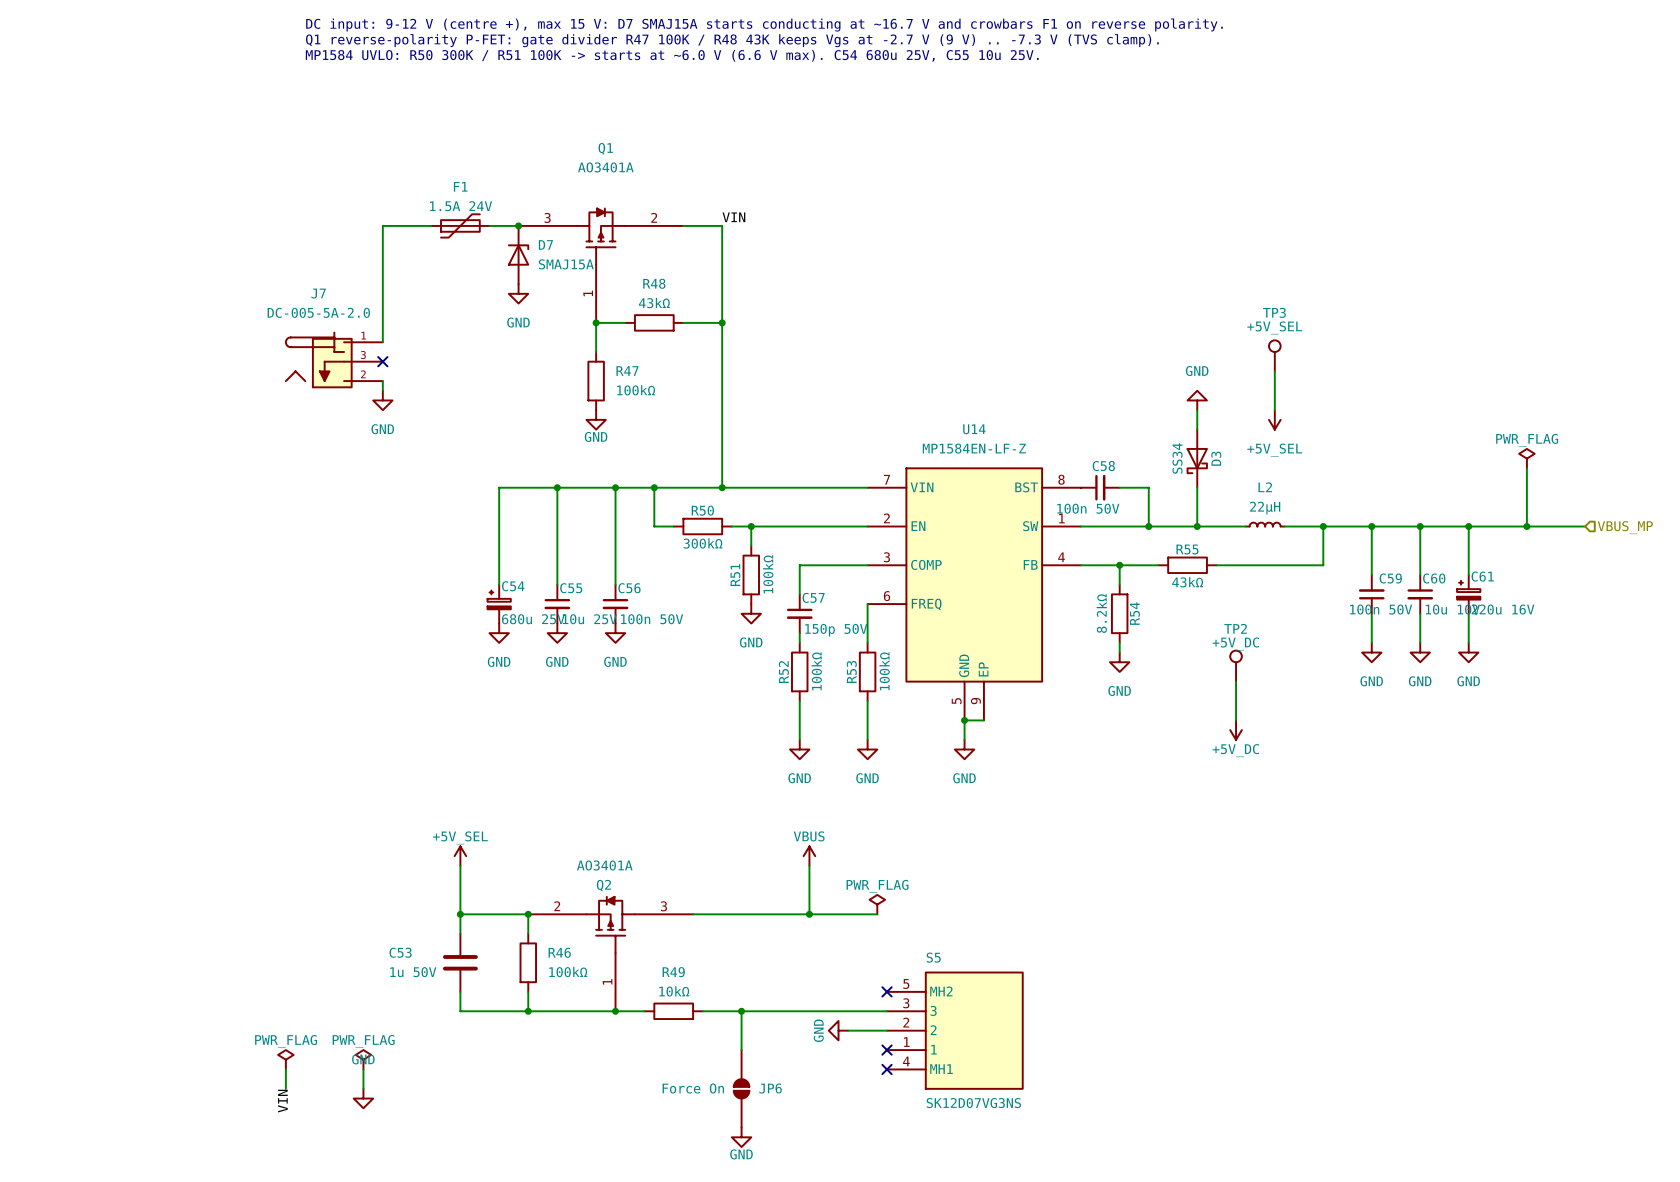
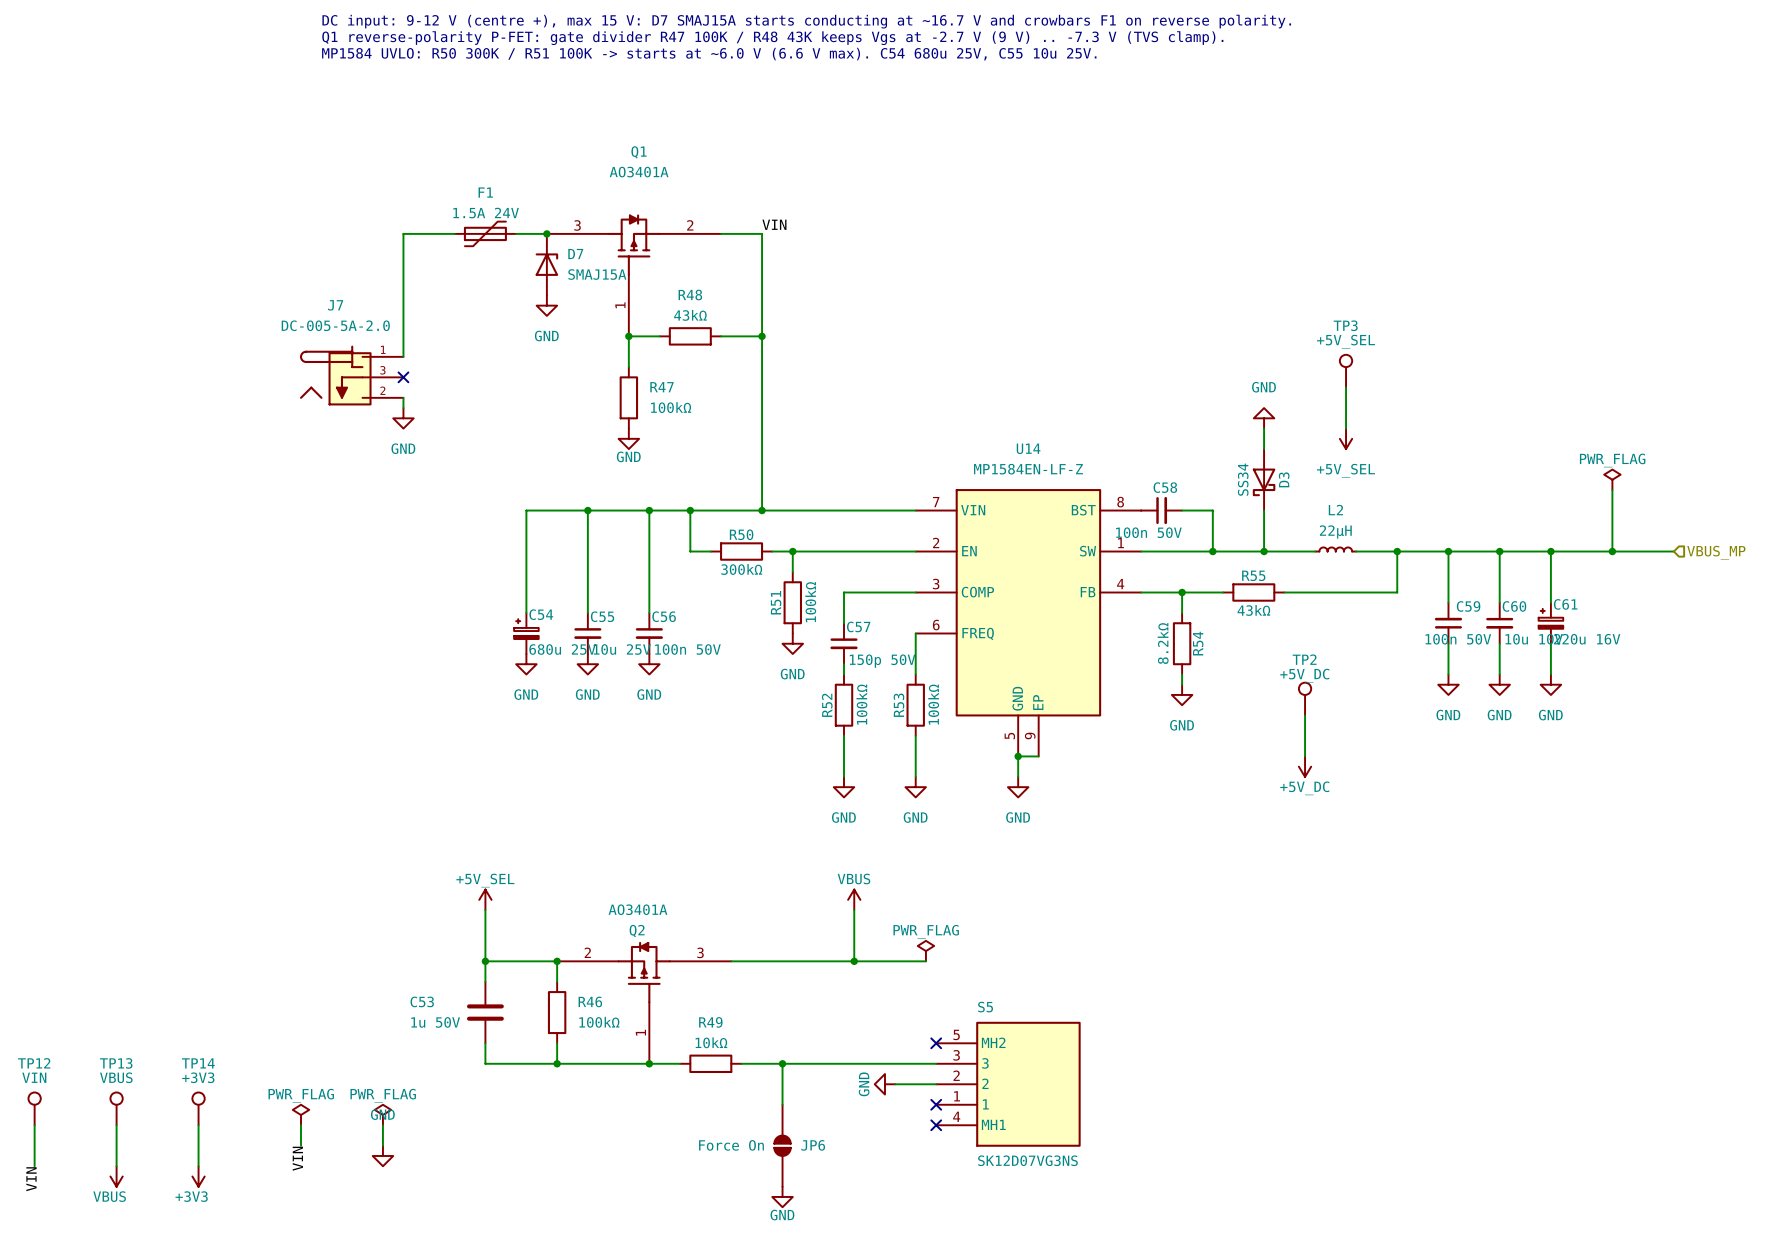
TP12: none -> VIN (34, 1108)
TP13: none -> VBUS (116, 1108)
TP14: none -> +3V3 (198, 1108)
wire: none -> (34, 1125) (34, 1166)
wire: none -> (116, 1125) (116, 1166)
wire: none -> (198, 1125) (198, 1166)
power symbol: none -> VBUS (116, 1176)
power symbol: none -> +3V3 (198, 1176)
label: none -> VIN (31, 1179)

